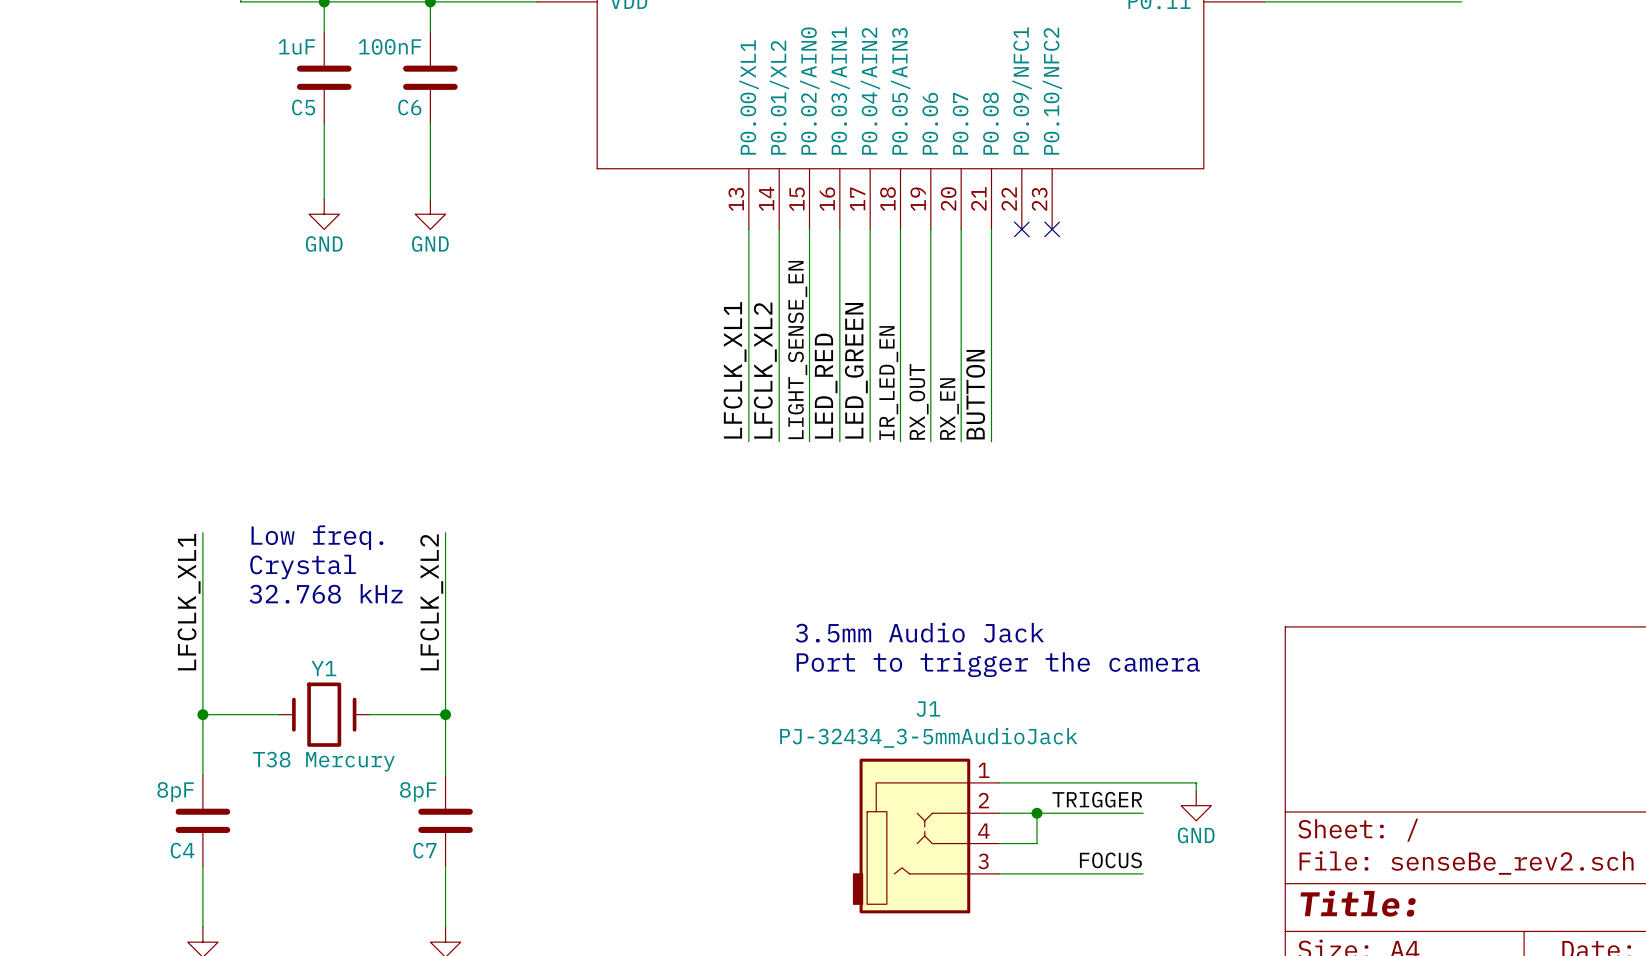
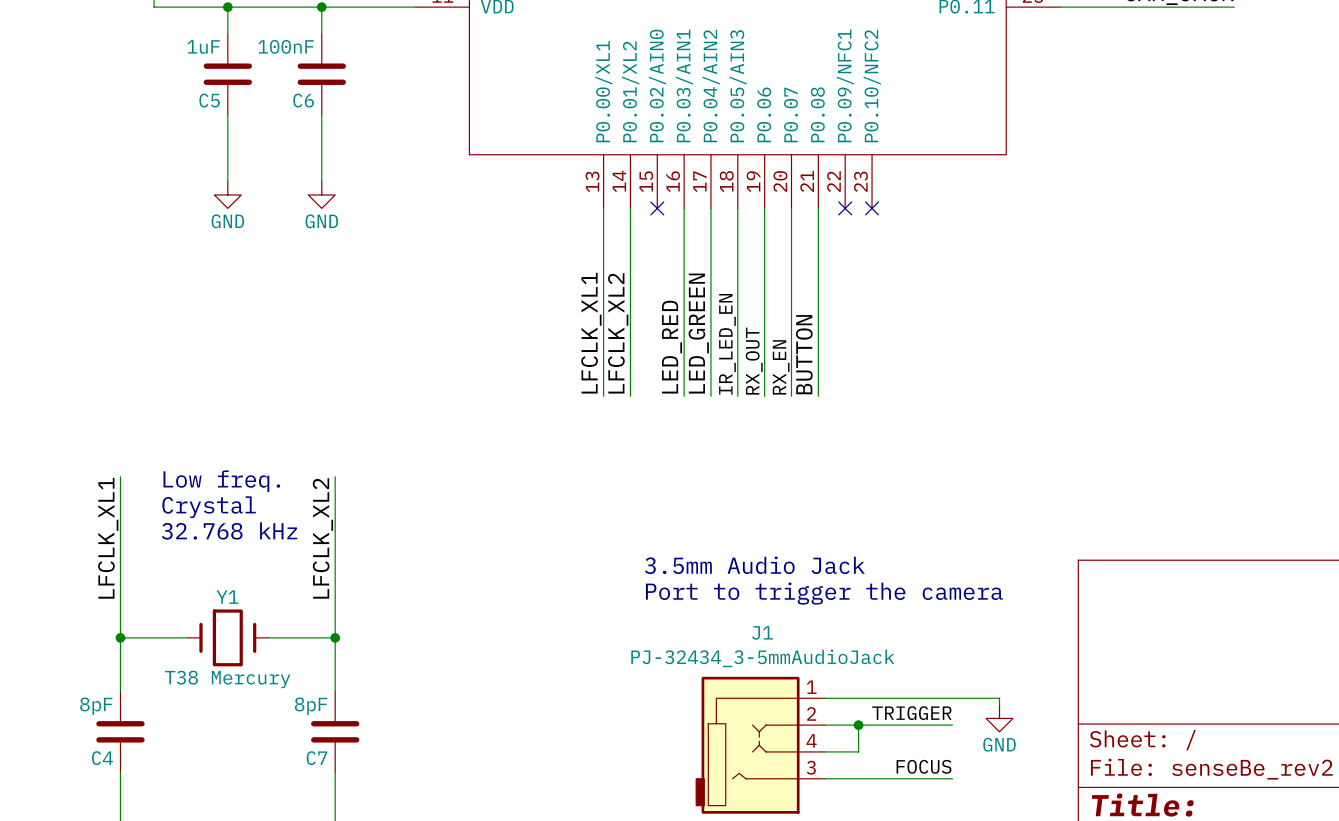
wire: (809, 229) (809, 441) -> none
no-connect mark: none -> (657, 208)
label: LIGHT_SENSE_EN (797, 350) -> none

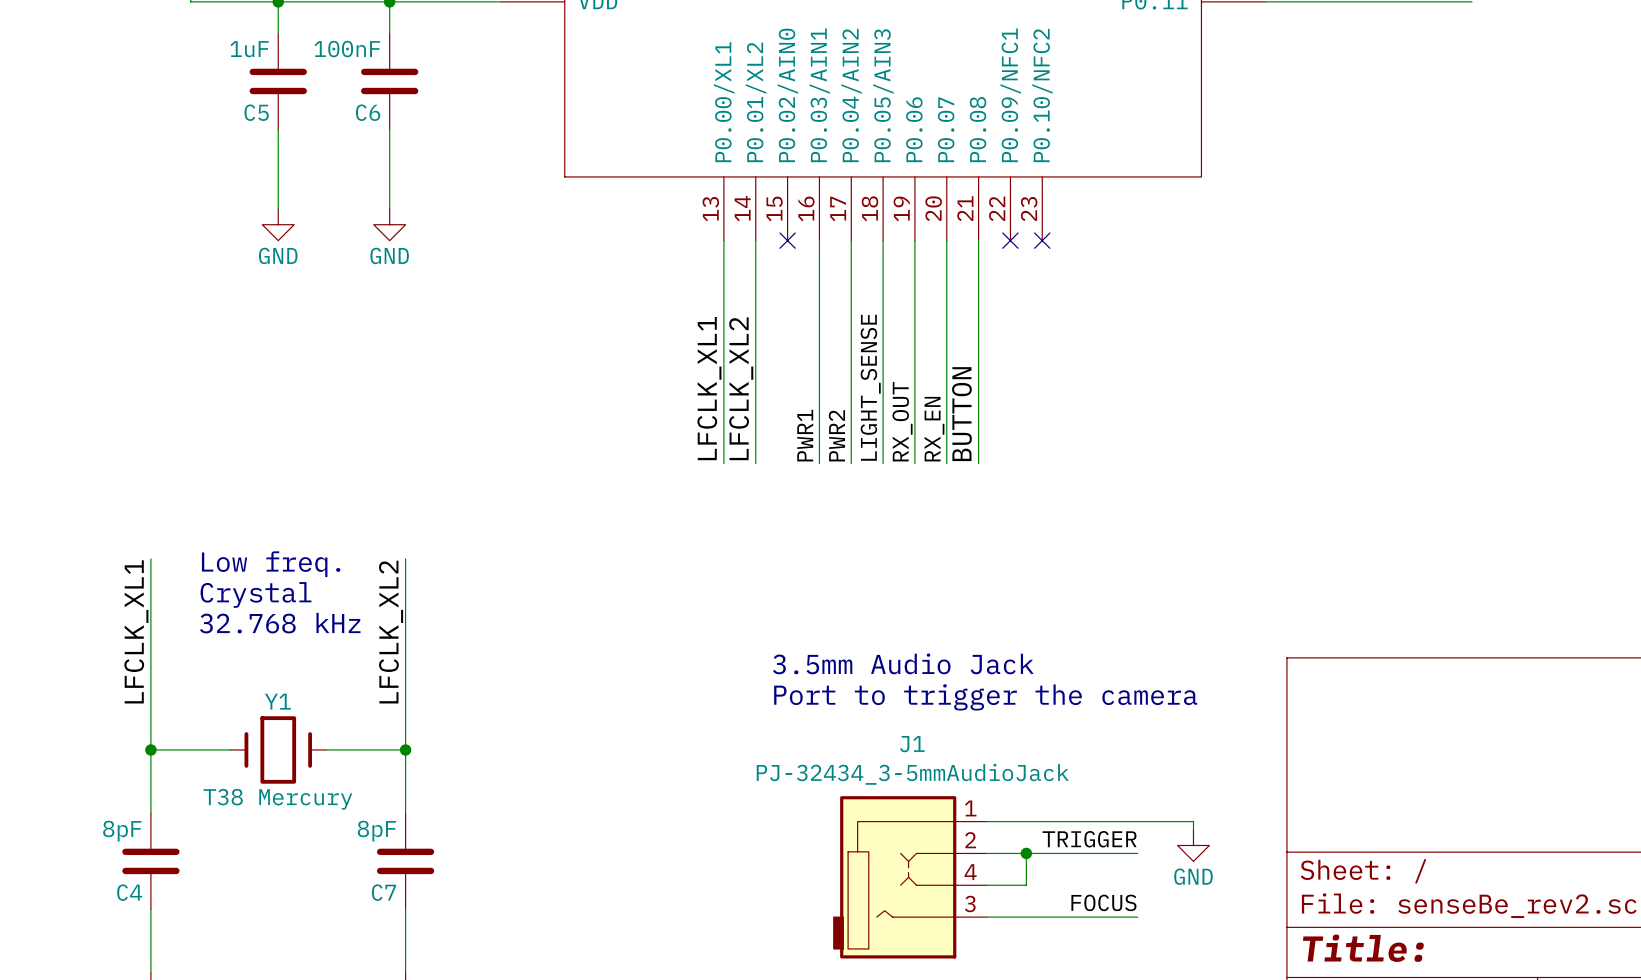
label: LED_GREEN (698, 333) -> PWR2 (836, 435)
label: IR_LED_EN (727, 344) -> LIGHT_SENSE (870, 387)
label: LED_RED (672, 347) -> PWR1 (805, 435)

